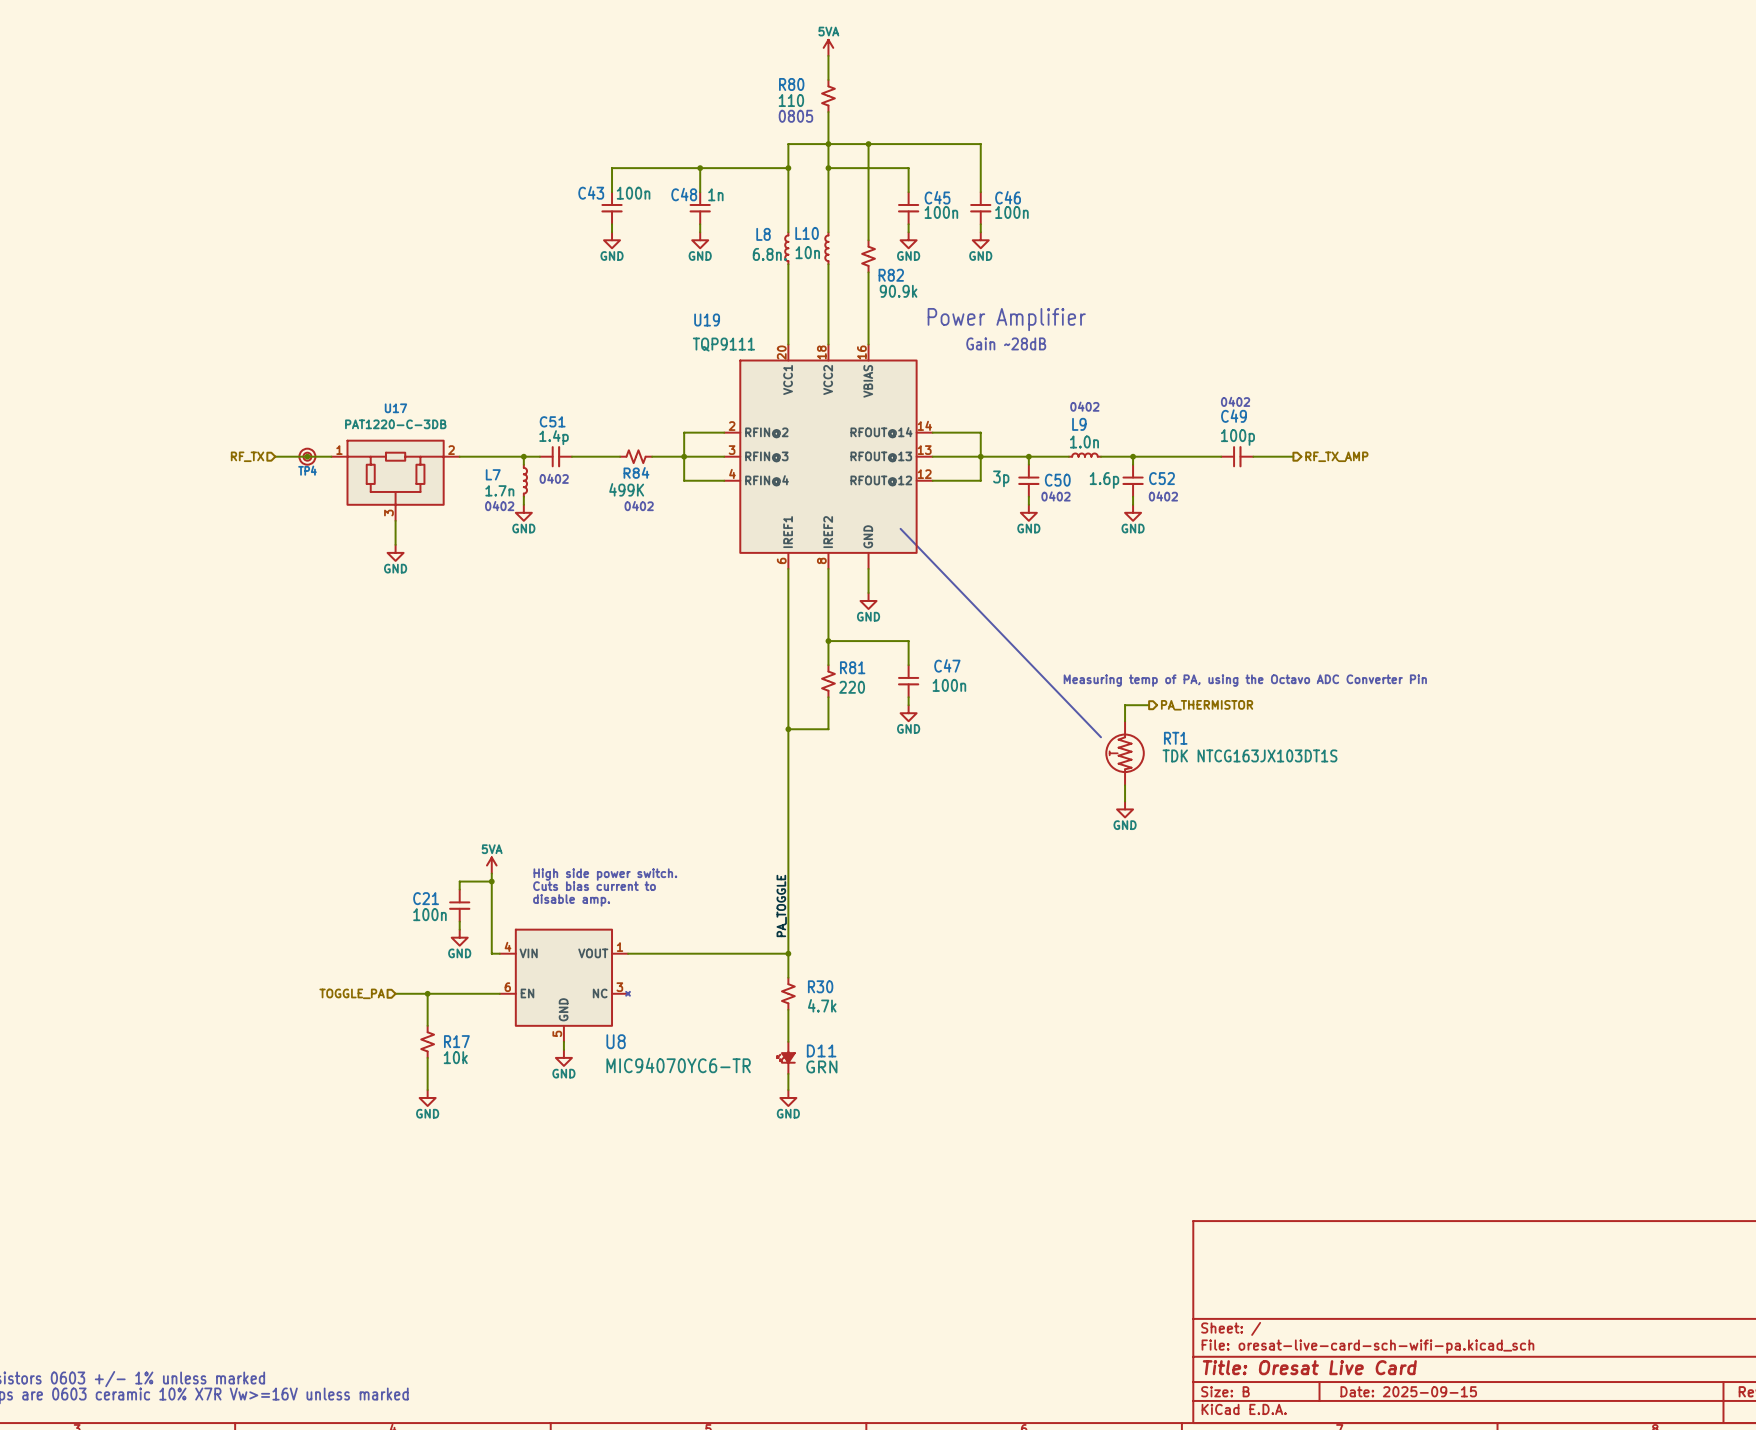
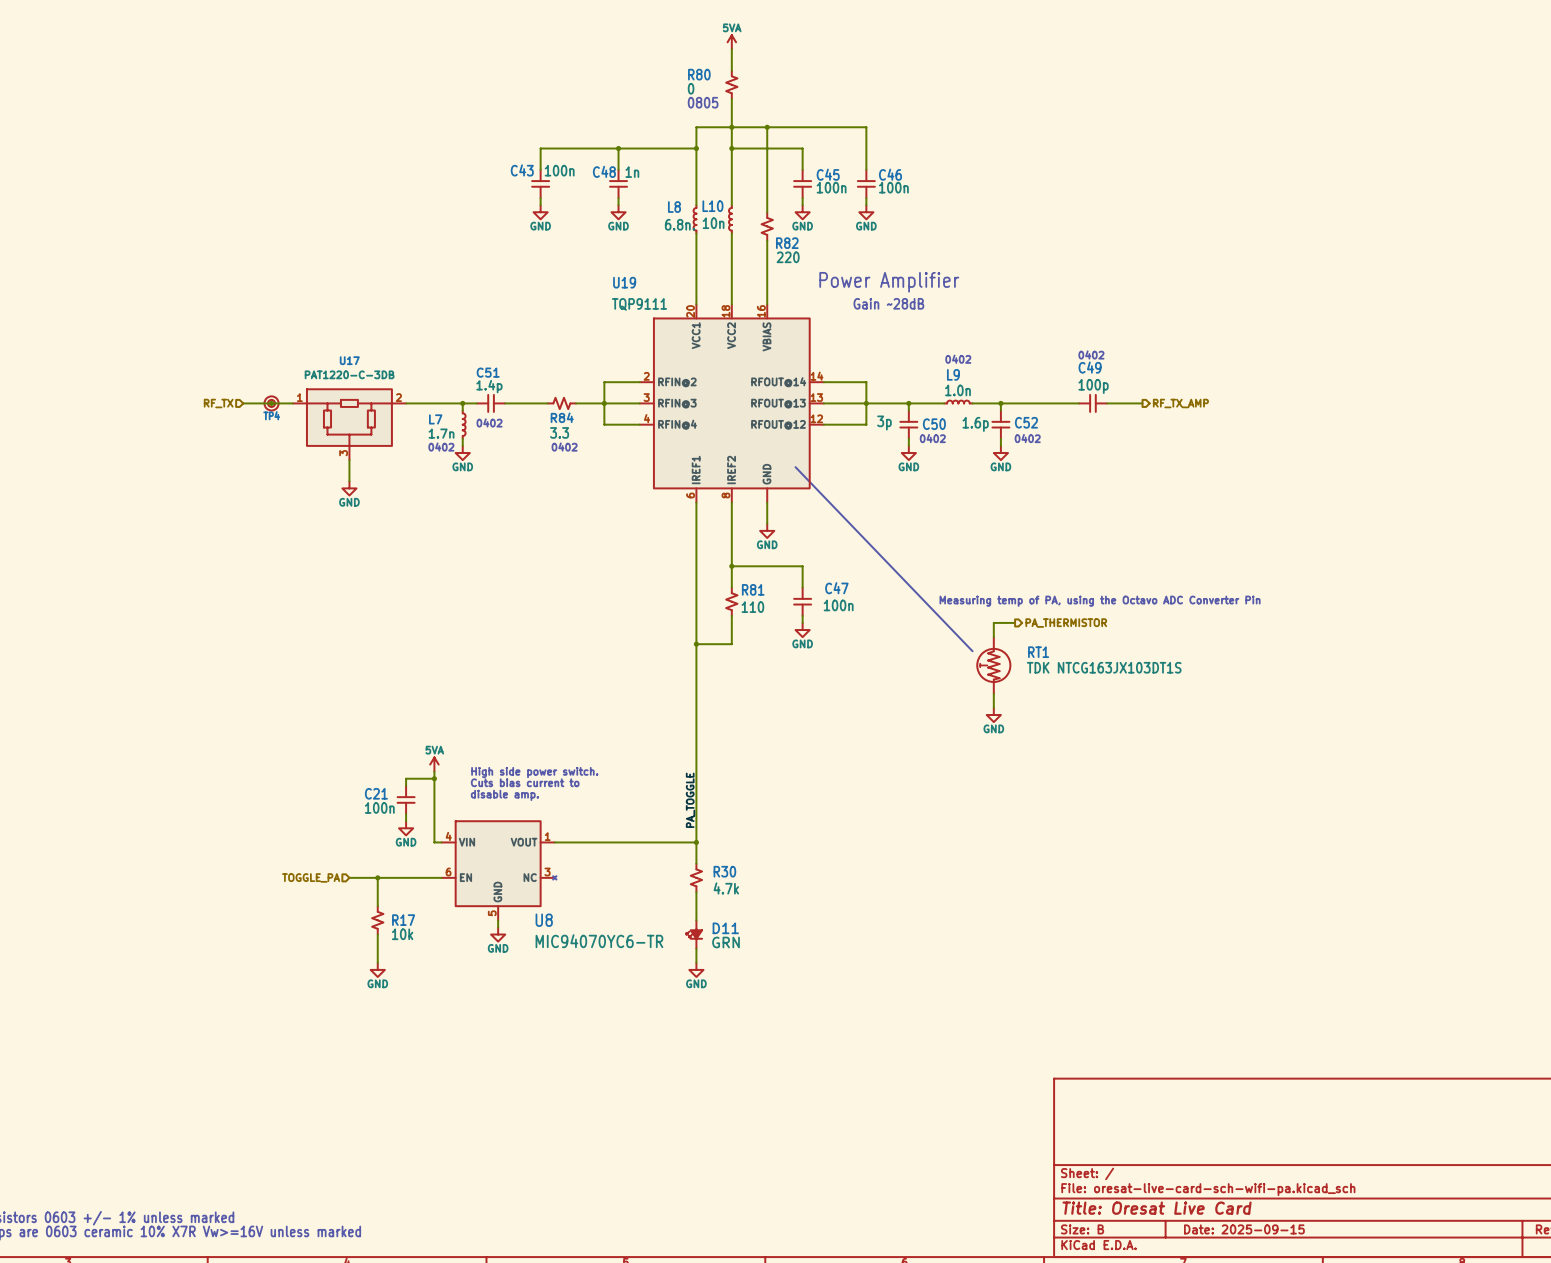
R80 value: 110 (791, 100) -> 0 (691, 88)
R82 value: 90.9k (898, 291) -> 220 (788, 257)
R84 value: 499K (626, 489) -> 3.3 (559, 432)
R81 value: 220 (852, 687) -> 110 (752, 607)

